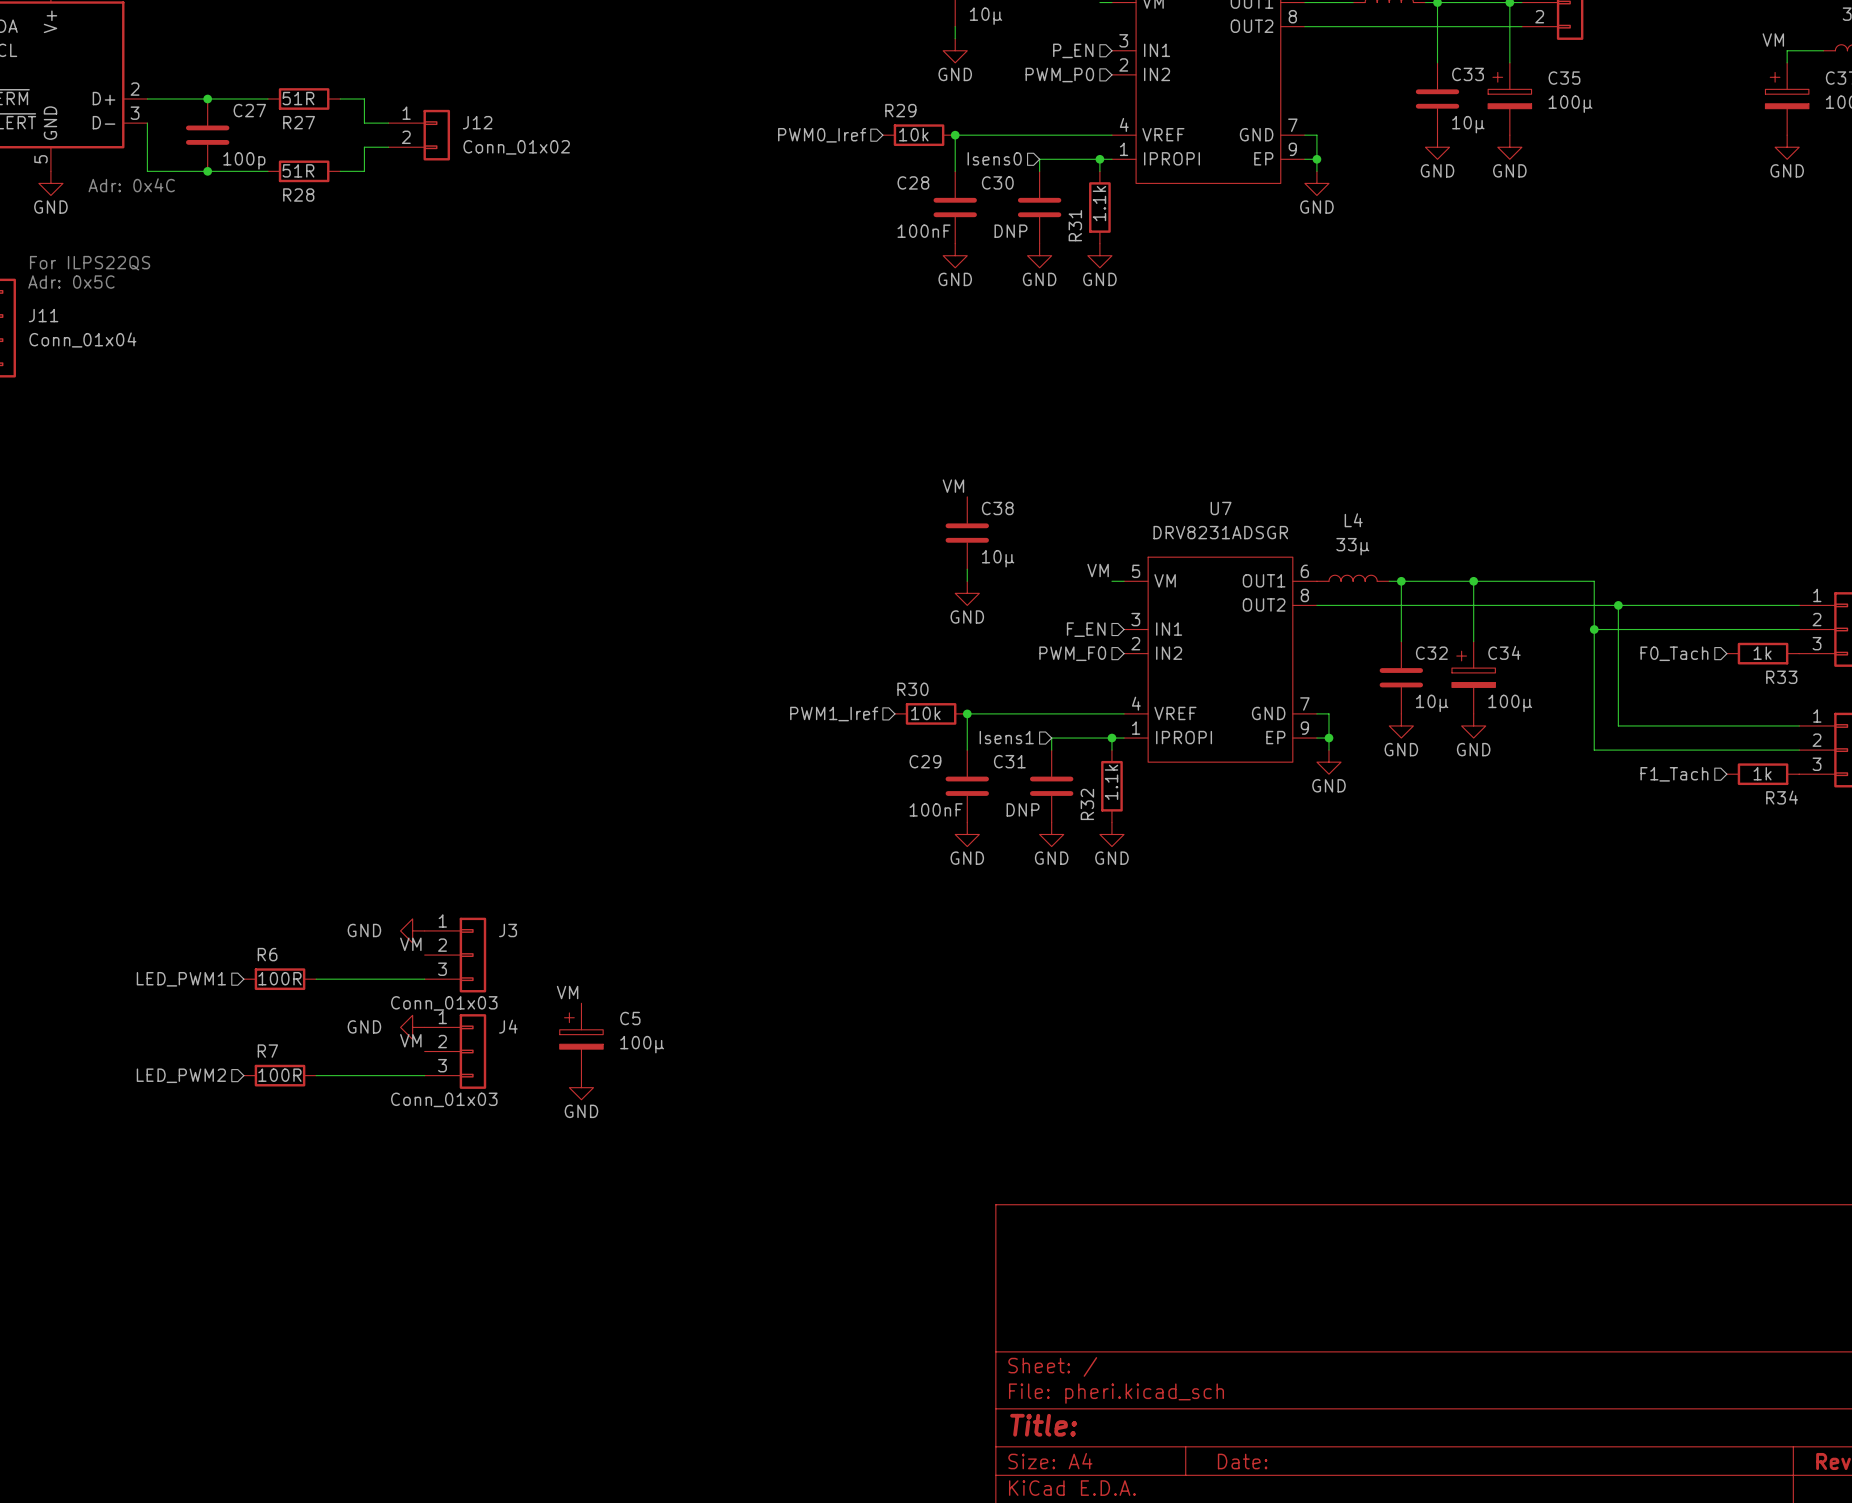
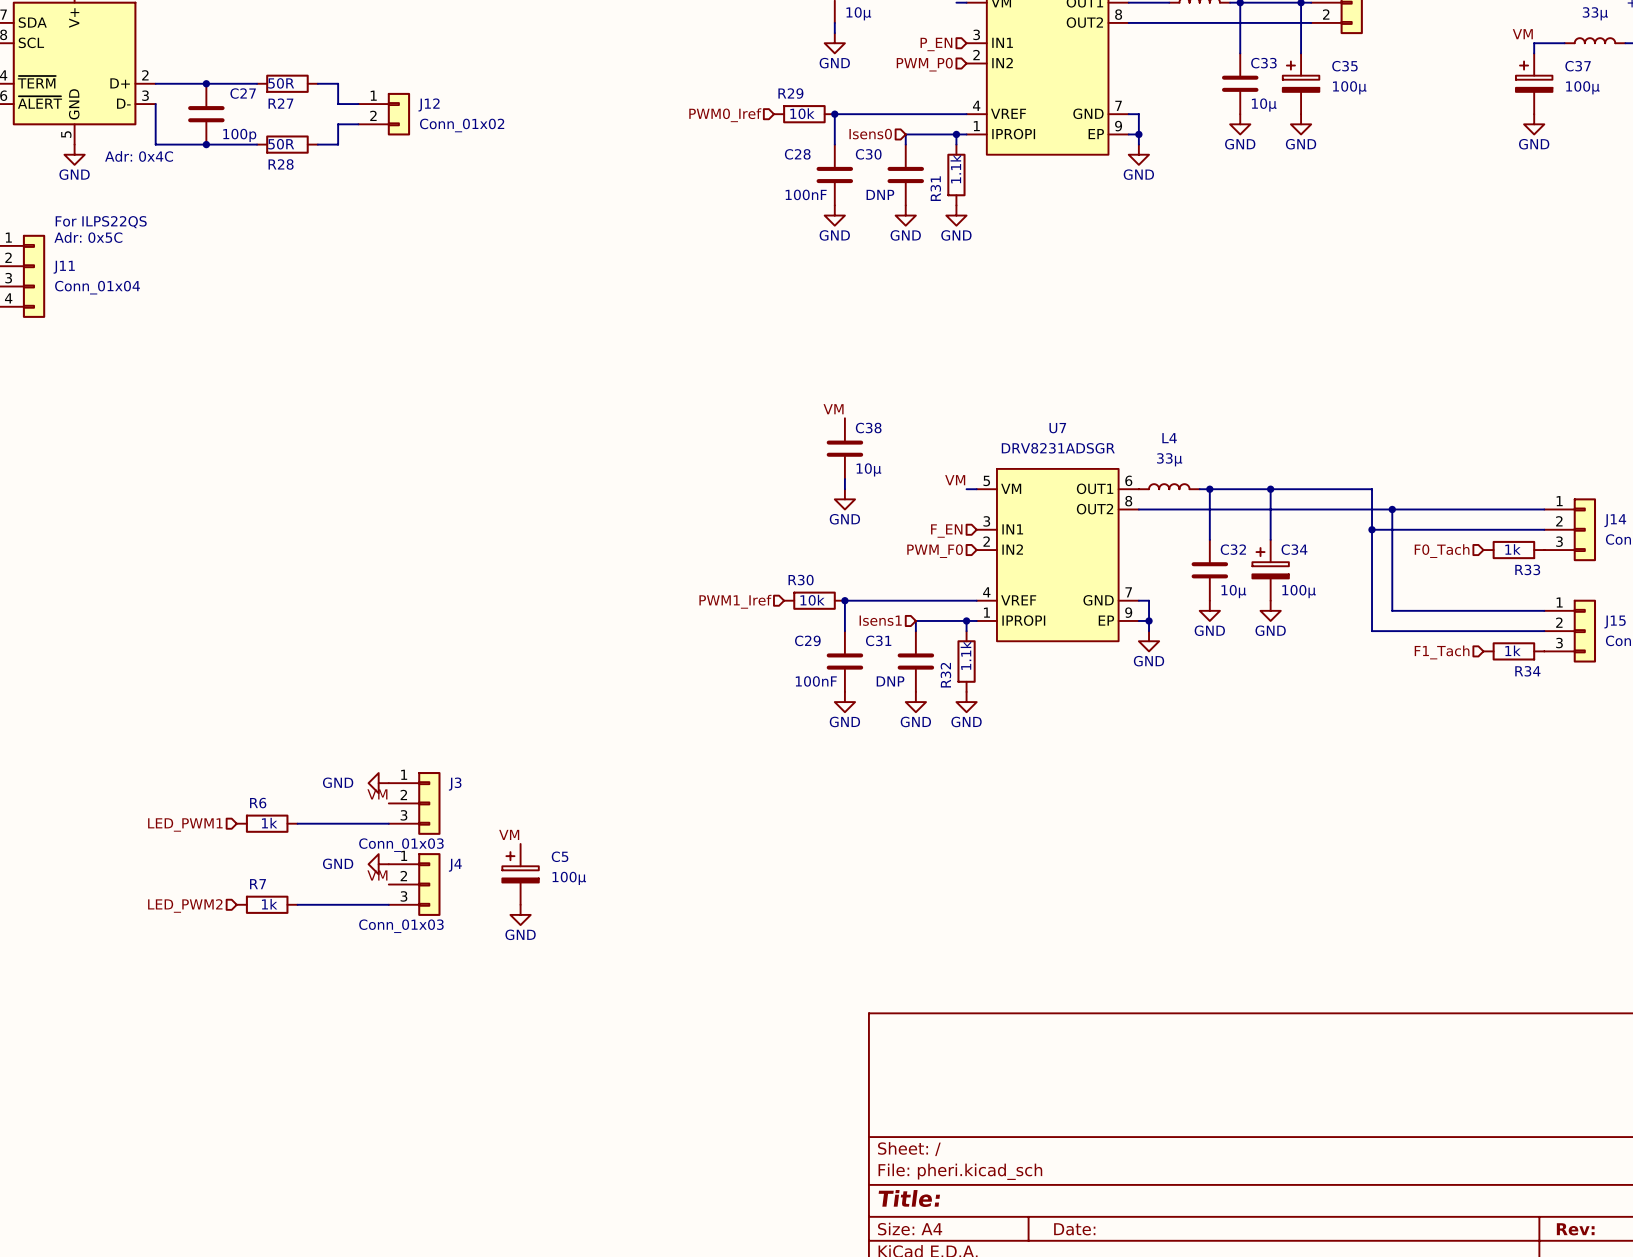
R27 value: 51R (298, 98) -> 50R (281, 83)
R28 value: 51R (298, 170) -> 50R (281, 144)
R6 value: 100R (279, 978) -> 1k (269, 823)
R7 value: 100R (279, 1075) -> 1k (269, 904)

